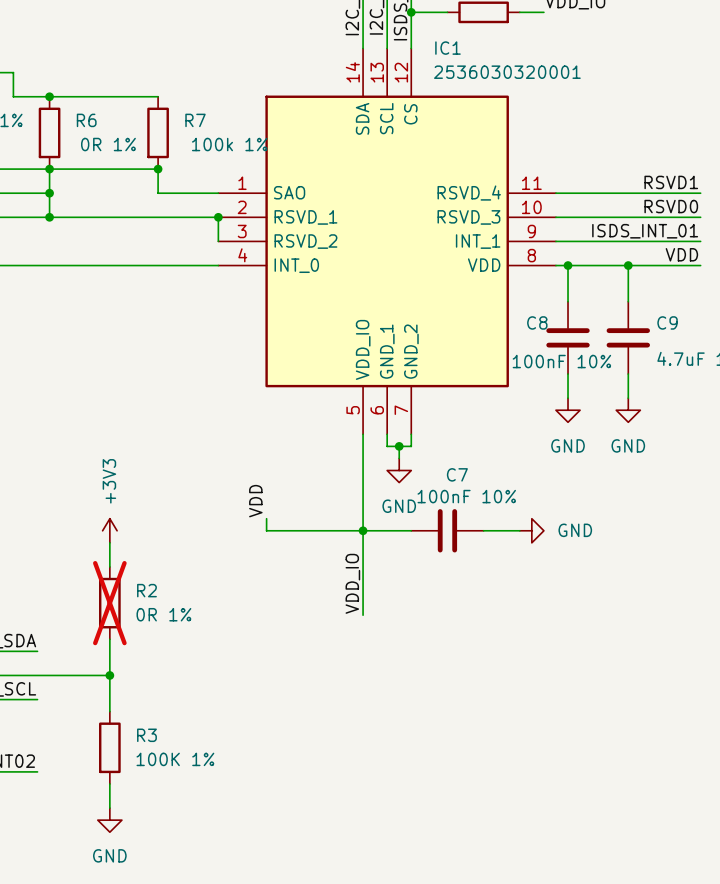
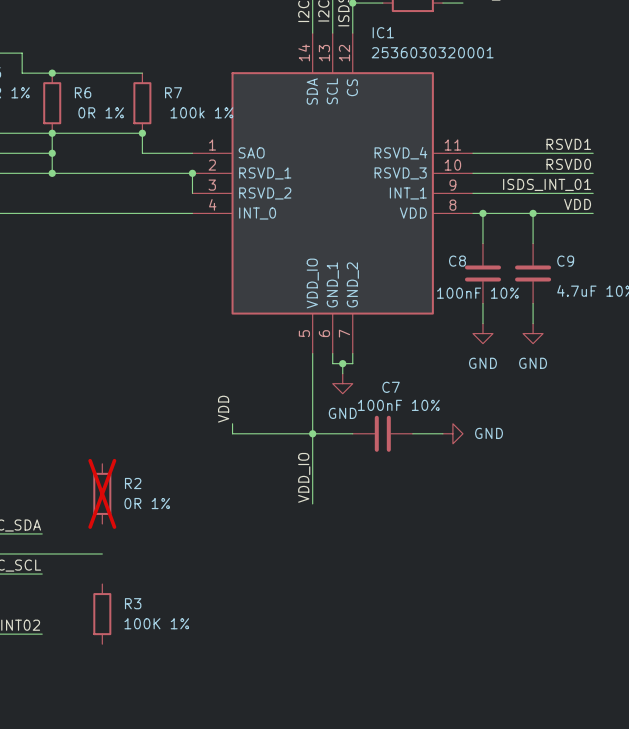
power symbol: +3V3 (109, 530) -> none
wire: (109, 542) (109, 566) -> none
wire: (109, 639) (109, 711) -> none
junction: (109, 675) -> none
wire: (109, 783) (109, 808) -> none
power symbol: GND (109, 820) -> none

